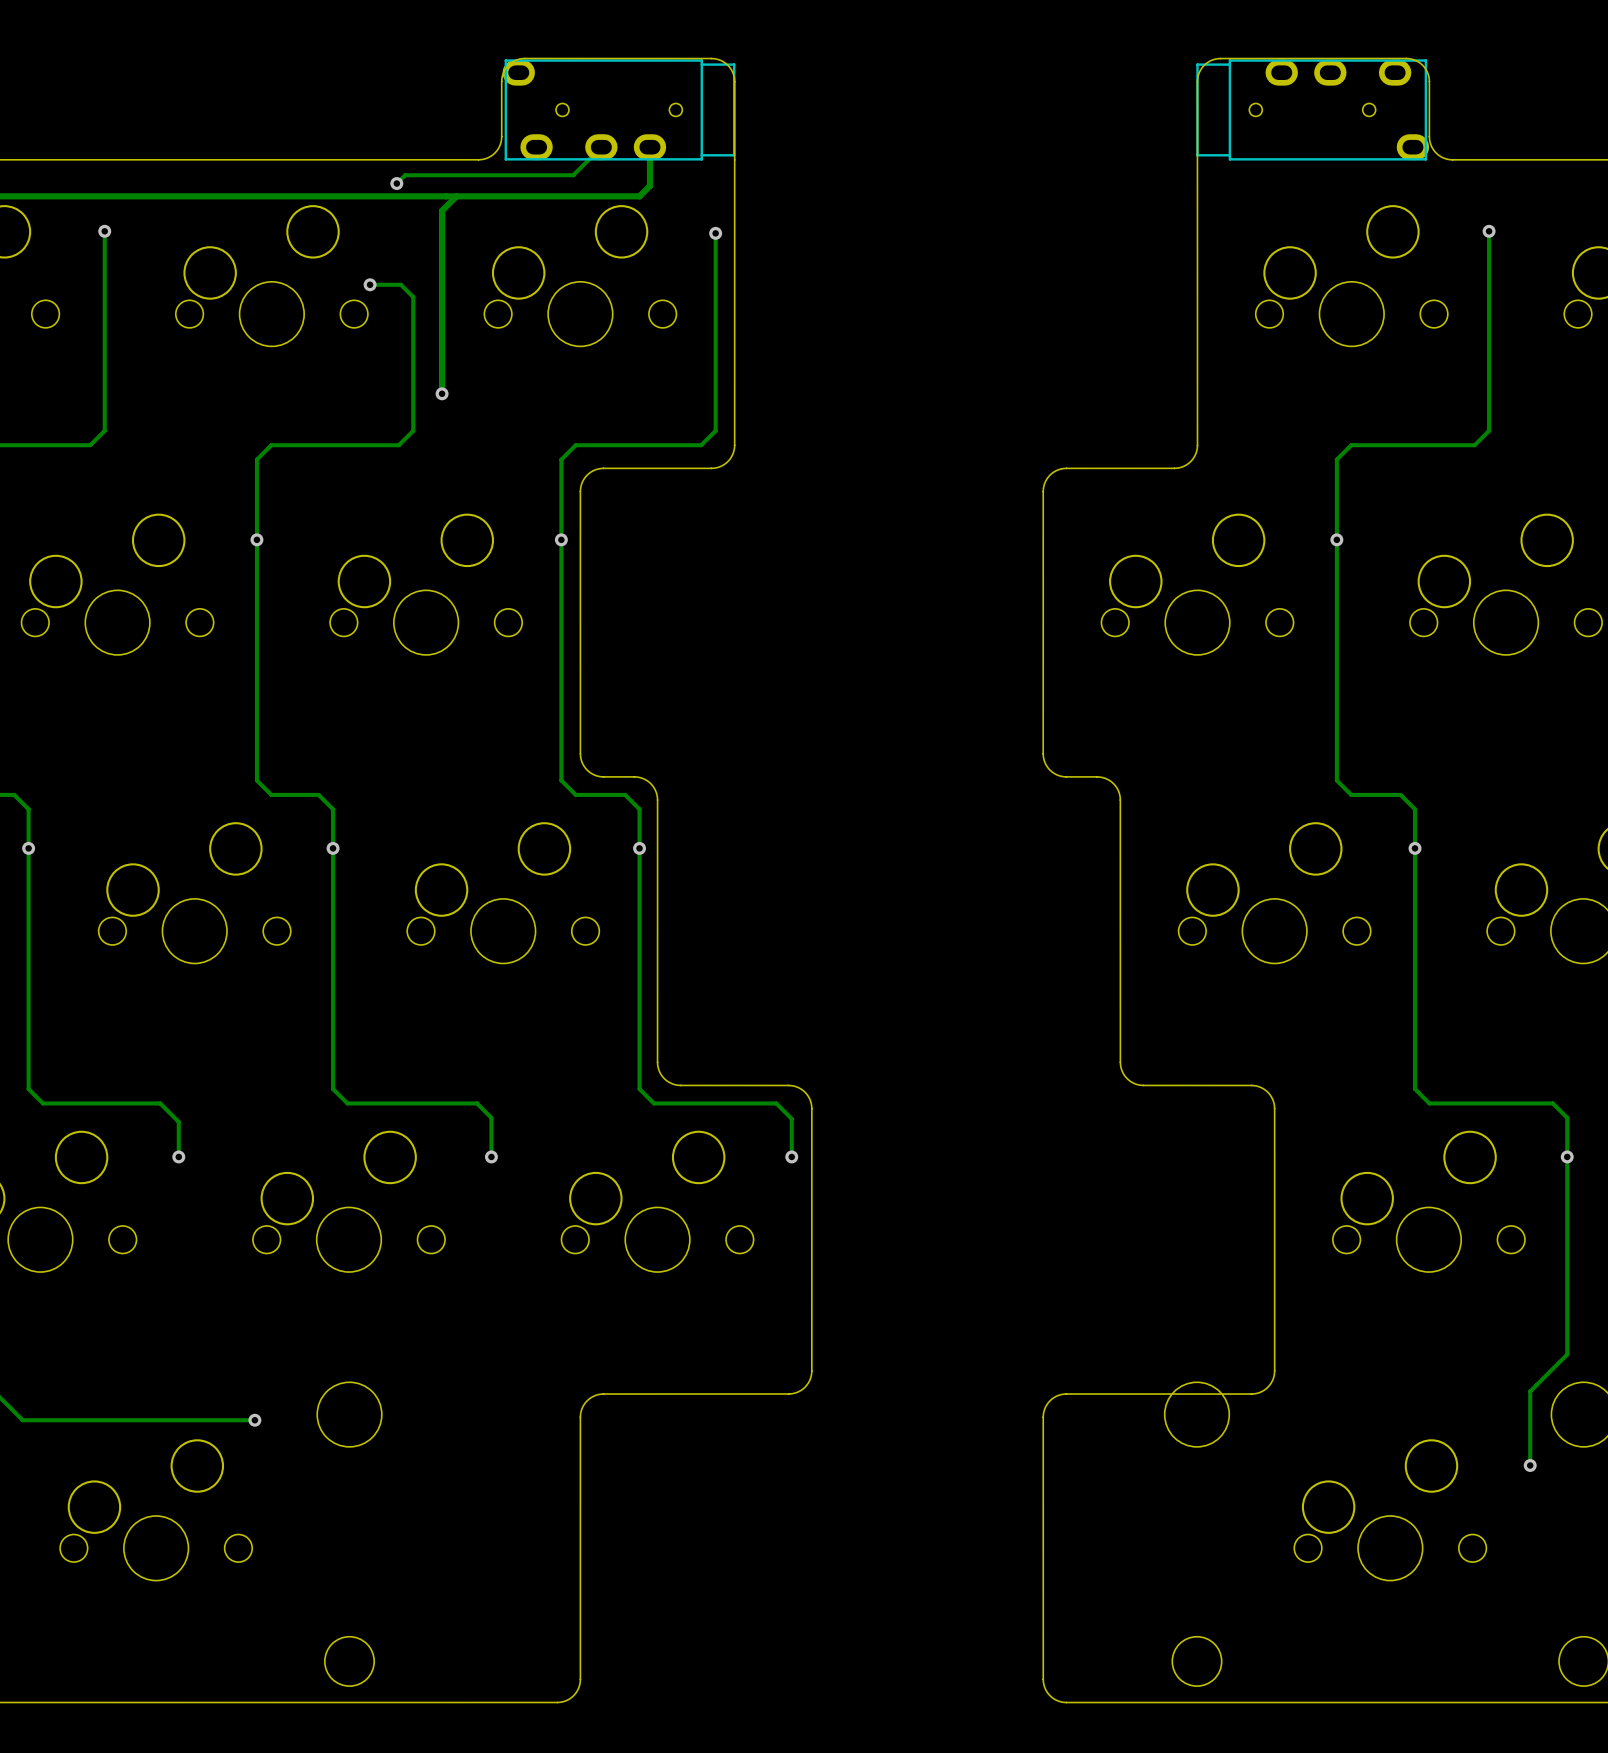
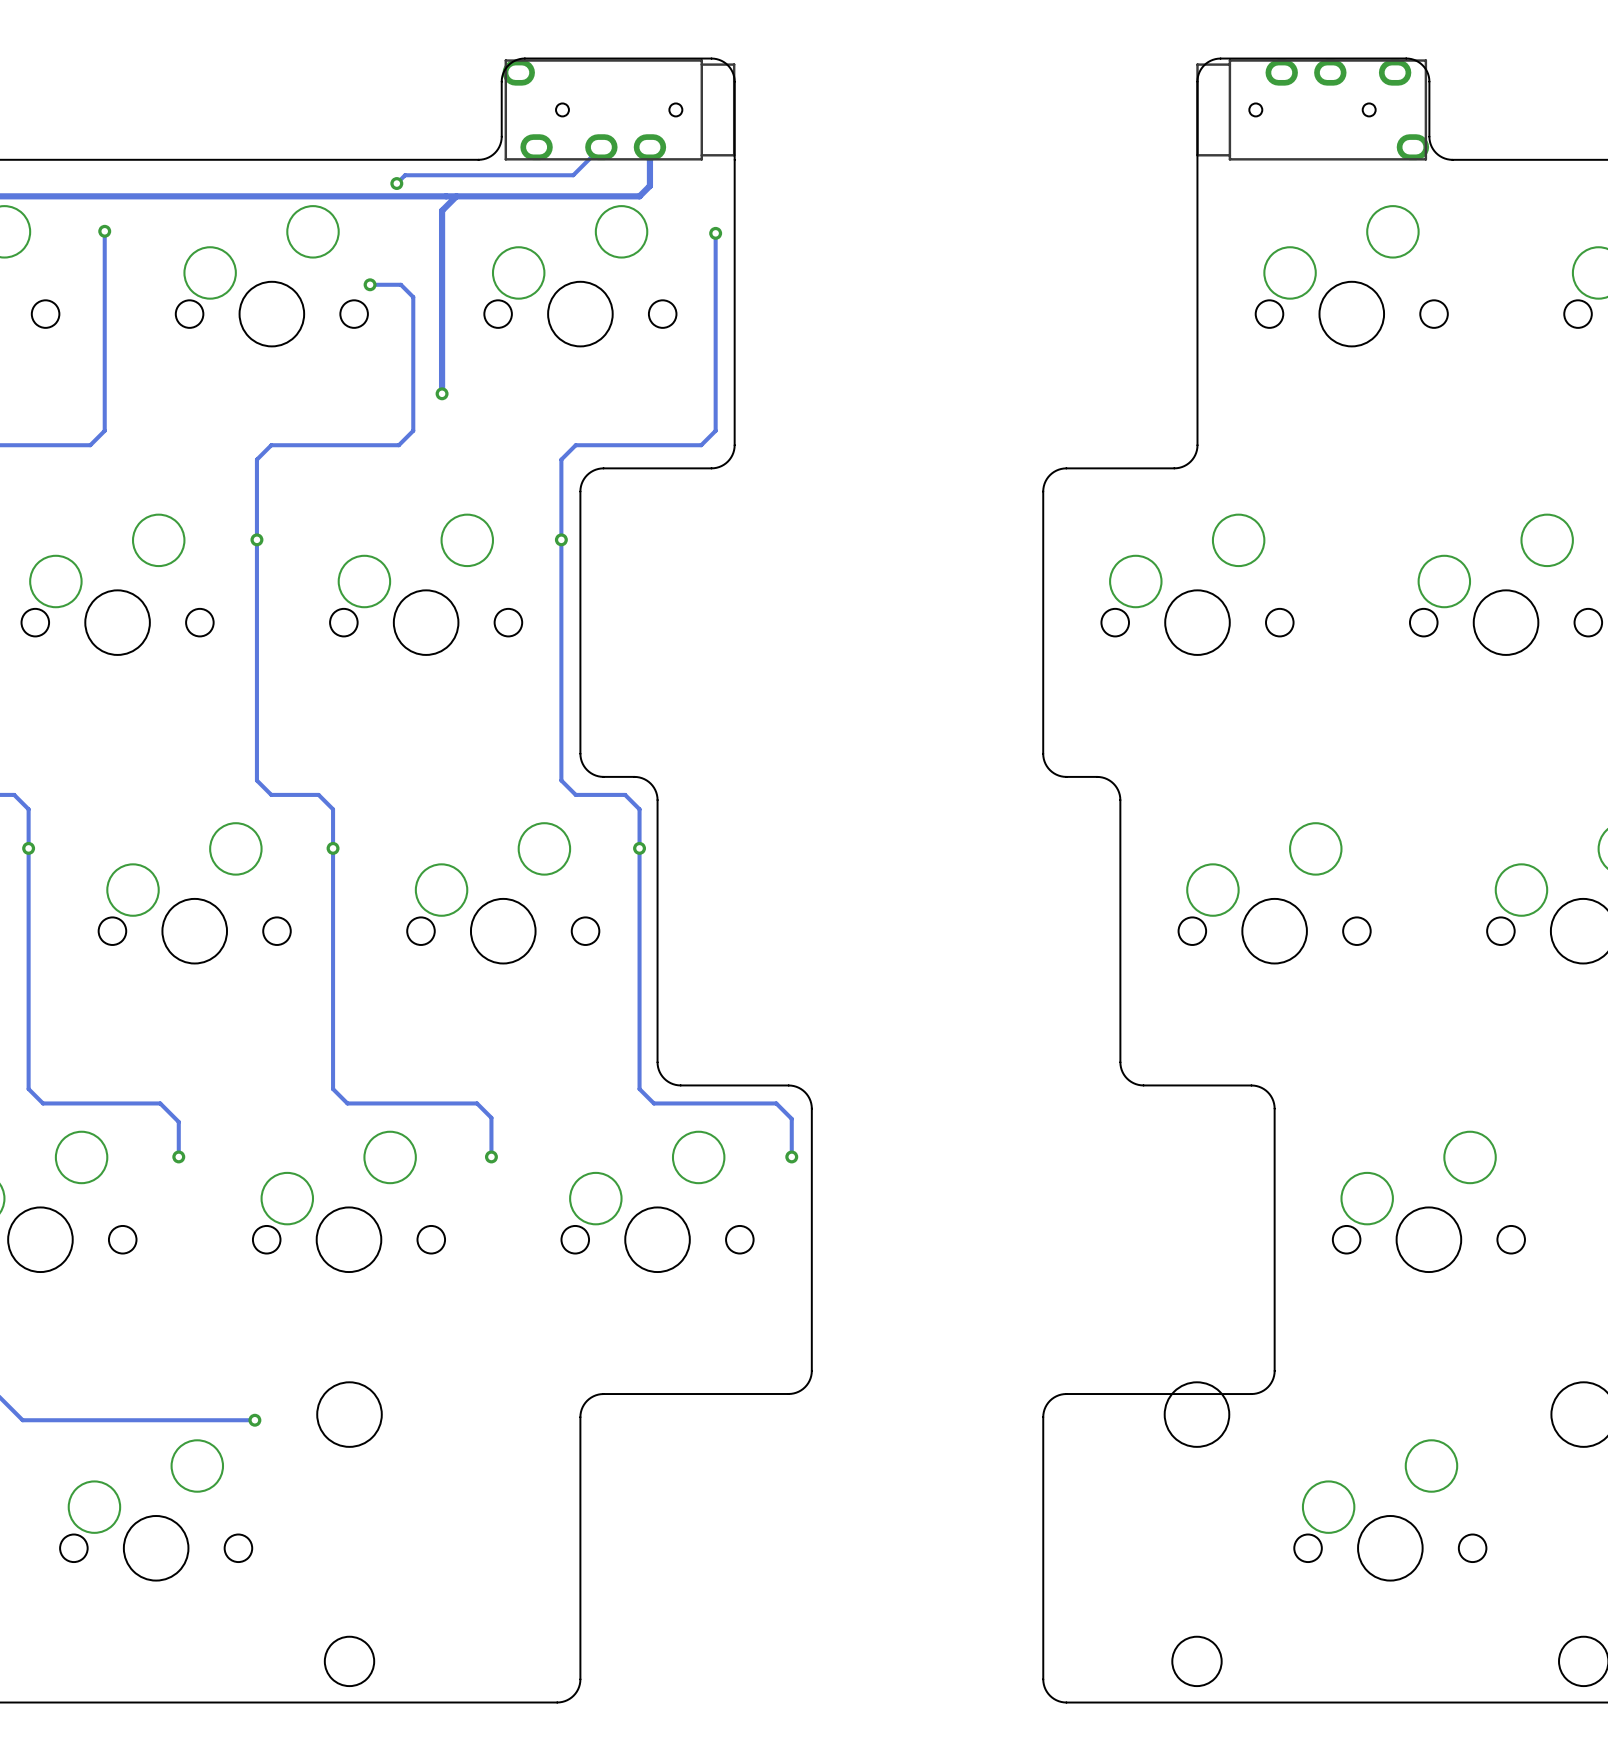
track: (1489, 231) (1489, 430) (1474, 445) (1351, 445) (1336, 459) (1336, 780) (1351, 794) (1400, 794) (1415, 809) (1415, 1089) (1429, 1103) (1552, 1103) (1567, 1117) (1567, 1354) (1530, 1391) (1530, 1465) -> none
via: (1489, 231) -> none
via: (1336, 539) -> none
via: (1415, 848) -> none
via: (1567, 1156) -> none
via: (1530, 1465) -> none

